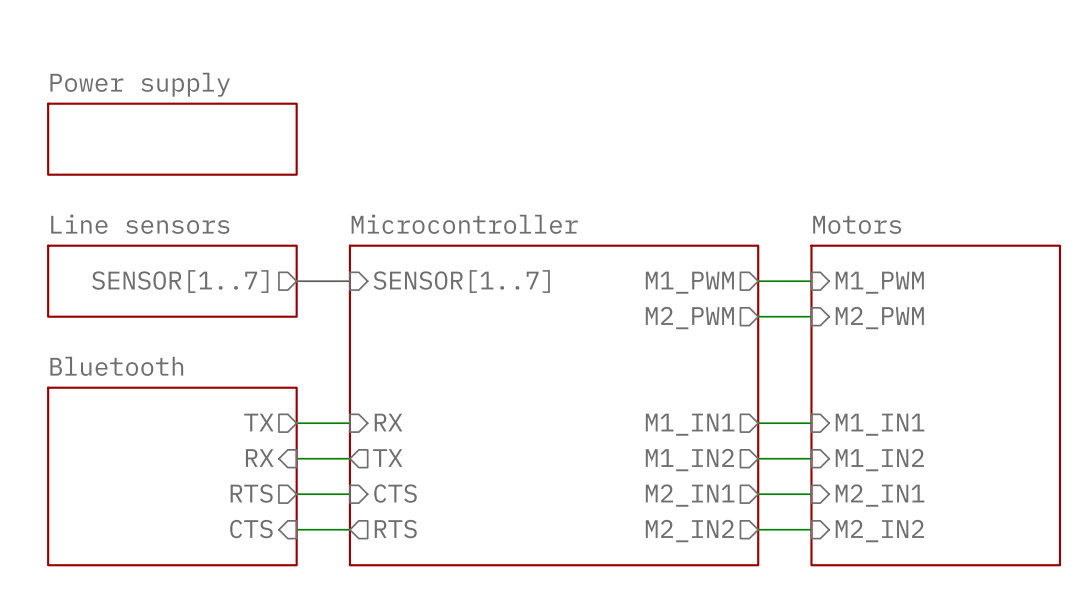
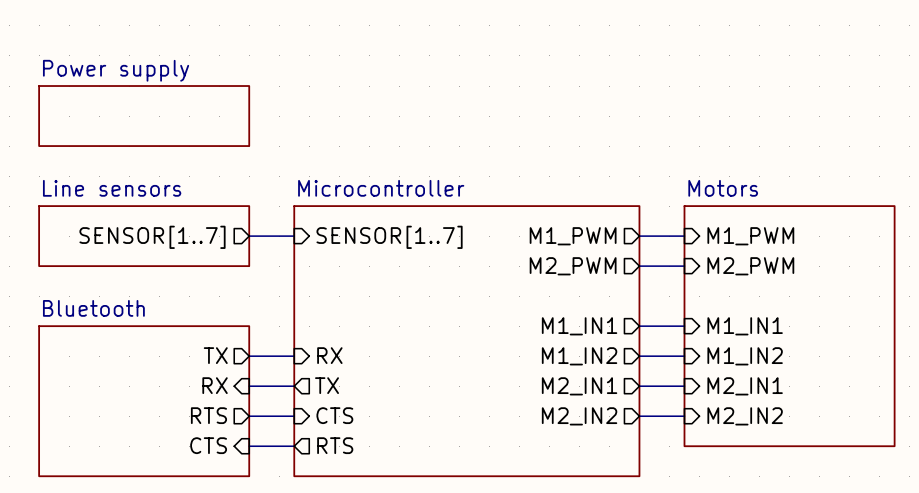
sheet Motors: none -> (789, 326)
sheet pin: none -> M1_IN1 (579, 326)
sheet pin: none -> M1_IN1 (745, 326)
sheet Motors: (935, 405) -> none
sheet pin: M1_IN1 (690, 424) -> M1_IN2 (579, 356)
sheet pin: M1_IN1 (880, 424) -> M1_IN2 (745, 356)
sheet pin: M1_IN2 (689, 460) -> M2_IN1 (579, 386)
sheet pin: M1_IN2 (879, 460) -> M2_IN1 (745, 386)
sheet pin: M2_IN1 (690, 495) -> M2_IN2 (579, 416)
sheet pin: M2_IN1 (880, 495) -> M2_IN2 (745, 416)
wire: (758, 529) (811, 529) -> (639, 326) (684, 326)
sheet pin: M2_IN2 (689, 531) -> none
sheet pin: M2_IN2 (879, 531) -> none

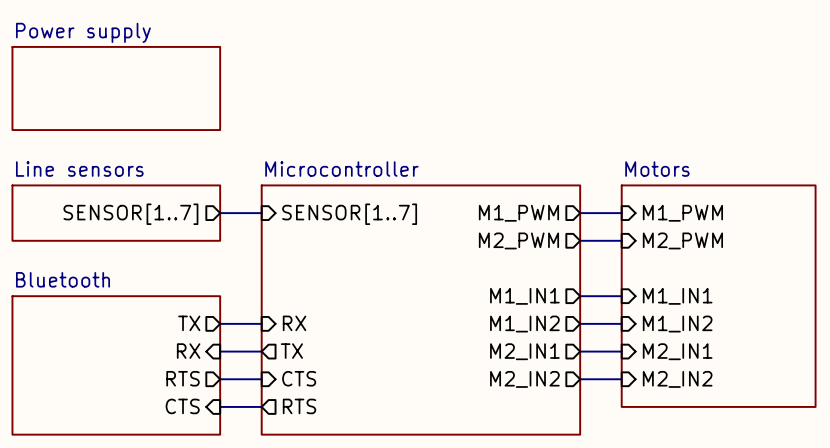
sheet Power supply: none -> (116, 88)
sheet Power supply: (144, 116) -> none
sheet Line sensors shape: [38, 205, 251, 268] -> [11, 184, 221, 242]
sheet Bluetooth shape: [38, 325, 251, 478] -> [11, 295, 221, 436]

